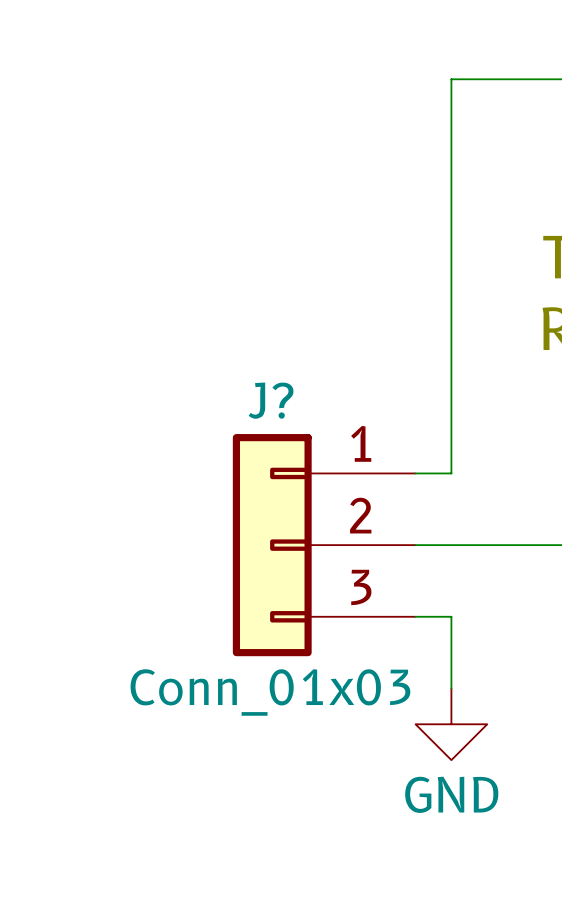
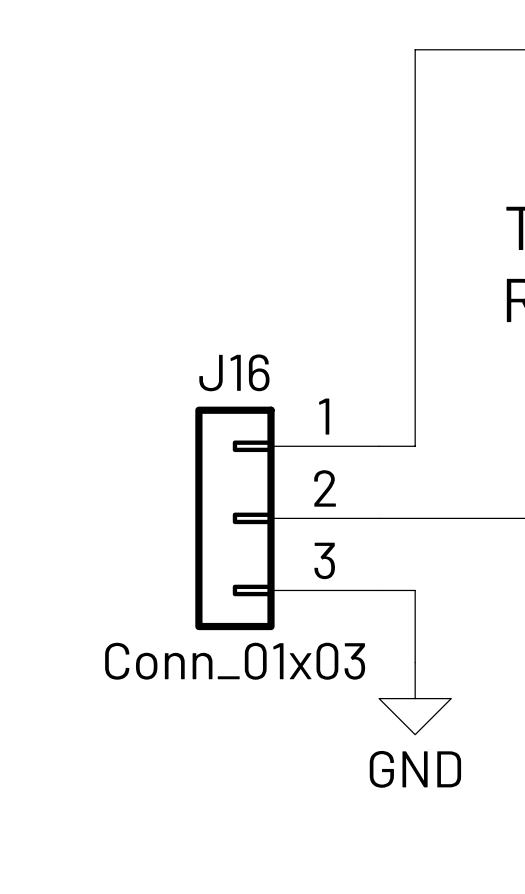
J? name: J? (271, 400) -> J16 (234, 372)

